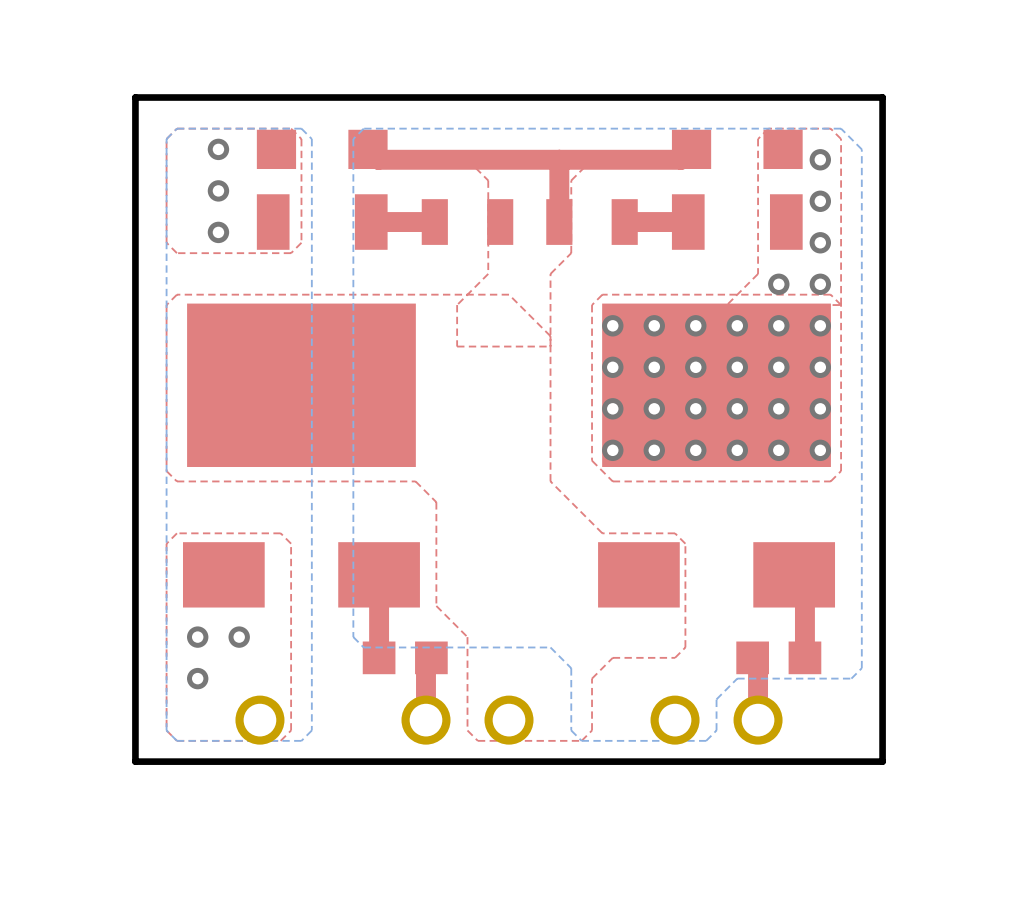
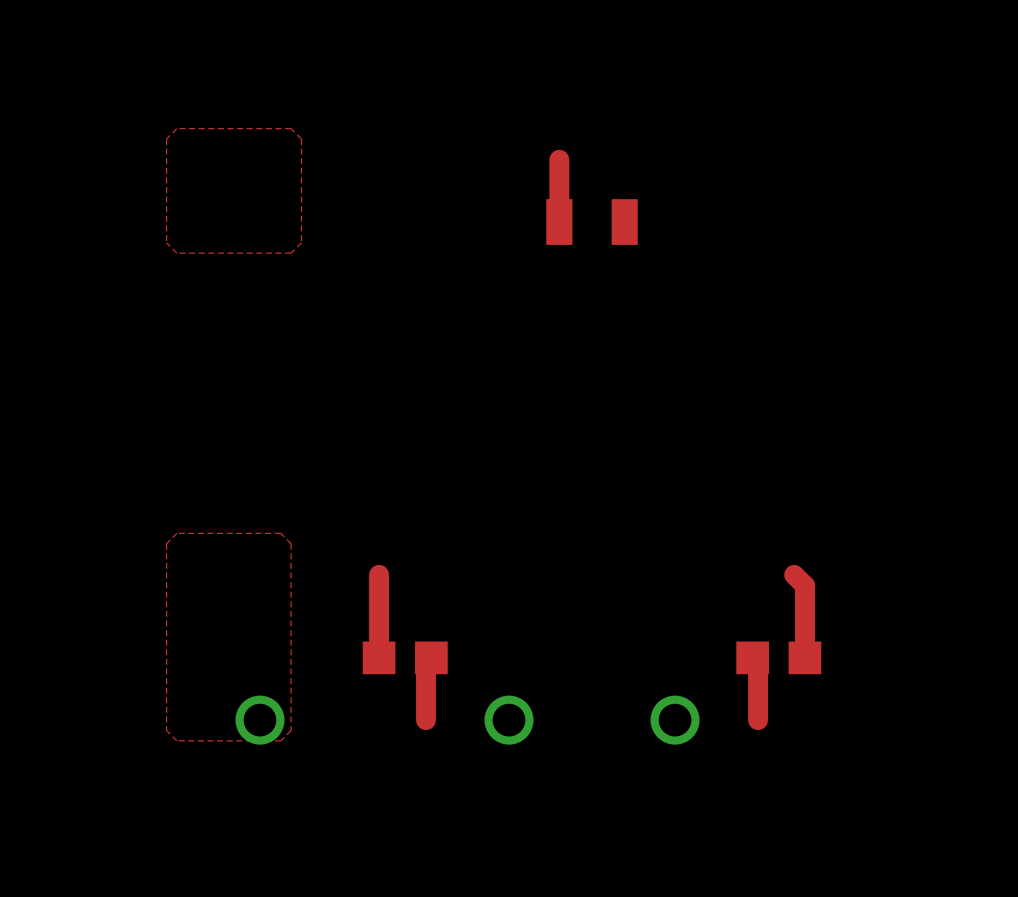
board edge: (882, 97) (882, 761) (135, 761) (135, 97) (882, 97) -> none
bottom zone outline: (301, 128) (176, 128) (166, 139) (166, 730) (176, 740) (301, 740) (311, 730) (311, 139) (301, 128) -> none
top zone outline: (830, 128) (768, 128) (758, 139) (758, 273) (726, 305) (841, 305) (830, 294) (602, 294) (592, 305) (592, 460) (612, 481) (830, 481) (841, 471) (841, 139) (830, 128) -> none
bottom zone outline: (841, 128) (363, 128) (353, 139) (353, 637) (363, 647) (550, 647) (571, 668) (571, 730) (581, 740) (706, 740) (716, 730) (716, 699) (737, 678) (851, 678) (861, 668) (861, 149) (841, 128) -> none
via: (218, 149) -> none
part: (322, 149) -> none
top track: (691, 149) (681, 159) (378, 159) (367, 149) -> none
part: (737, 149) -> none
via: (820, 159) -> none
via: (218, 190) -> none
via: (820, 201) -> none
part: (322, 222) -> none
top track: (434, 222) (371, 222) -> none
part: (467, 222) -> none
top track: (688, 222) (624, 222) -> none
part: (737, 222) -> none
via: (218, 232) -> none
via: (820, 242) -> none
via: (778, 284) -> none
via: (820, 284) -> none
via: (612, 325) -> none
via: (654, 325) -> none
via: (695, 325) -> none
via: (737, 325) -> none
via: (778, 325) -> none
via: (820, 325) -> none
top zone outline: (550, 336) (509, 294) (176, 294) (166, 305) (166, 471) (176, 481) (415, 481) (436, 502) (436, 605) (467, 637) (467, 730) (477, 740) (581, 740) (592, 730) (592, 678) (612, 657) (675, 657) (685, 647) (685, 543) (675, 533) (602, 533) (550, 481) (550, 273) (571, 253) (571, 180) (592, 159) (467, 159) (488, 180) (488, 273) (457, 305) (457, 346) (550, 346) -> none
via: (612, 367) -> none
via: (654, 367) -> none
via: (695, 367) -> none
via: (737, 367) -> none
via: (778, 367) -> none
via: (820, 367) -> none
via: (612, 408) -> none
via: (654, 408) -> none
via: (695, 408) -> none
via: (737, 408) -> none
via: (778, 408) -> none
via: (820, 408) -> none
via: (612, 450) -> none
via: (654, 450) -> none
via: (695, 450) -> none
via: (737, 450) -> none
via: (778, 450) -> none
via: (820, 450) -> none
part: (301, 455) -> none
part: (716, 455) -> none
via: (197, 637) -> none
via: (239, 637) -> none
via: (197, 678) -> none
part: (425, 720) -> none
part: (758, 720) -> none

